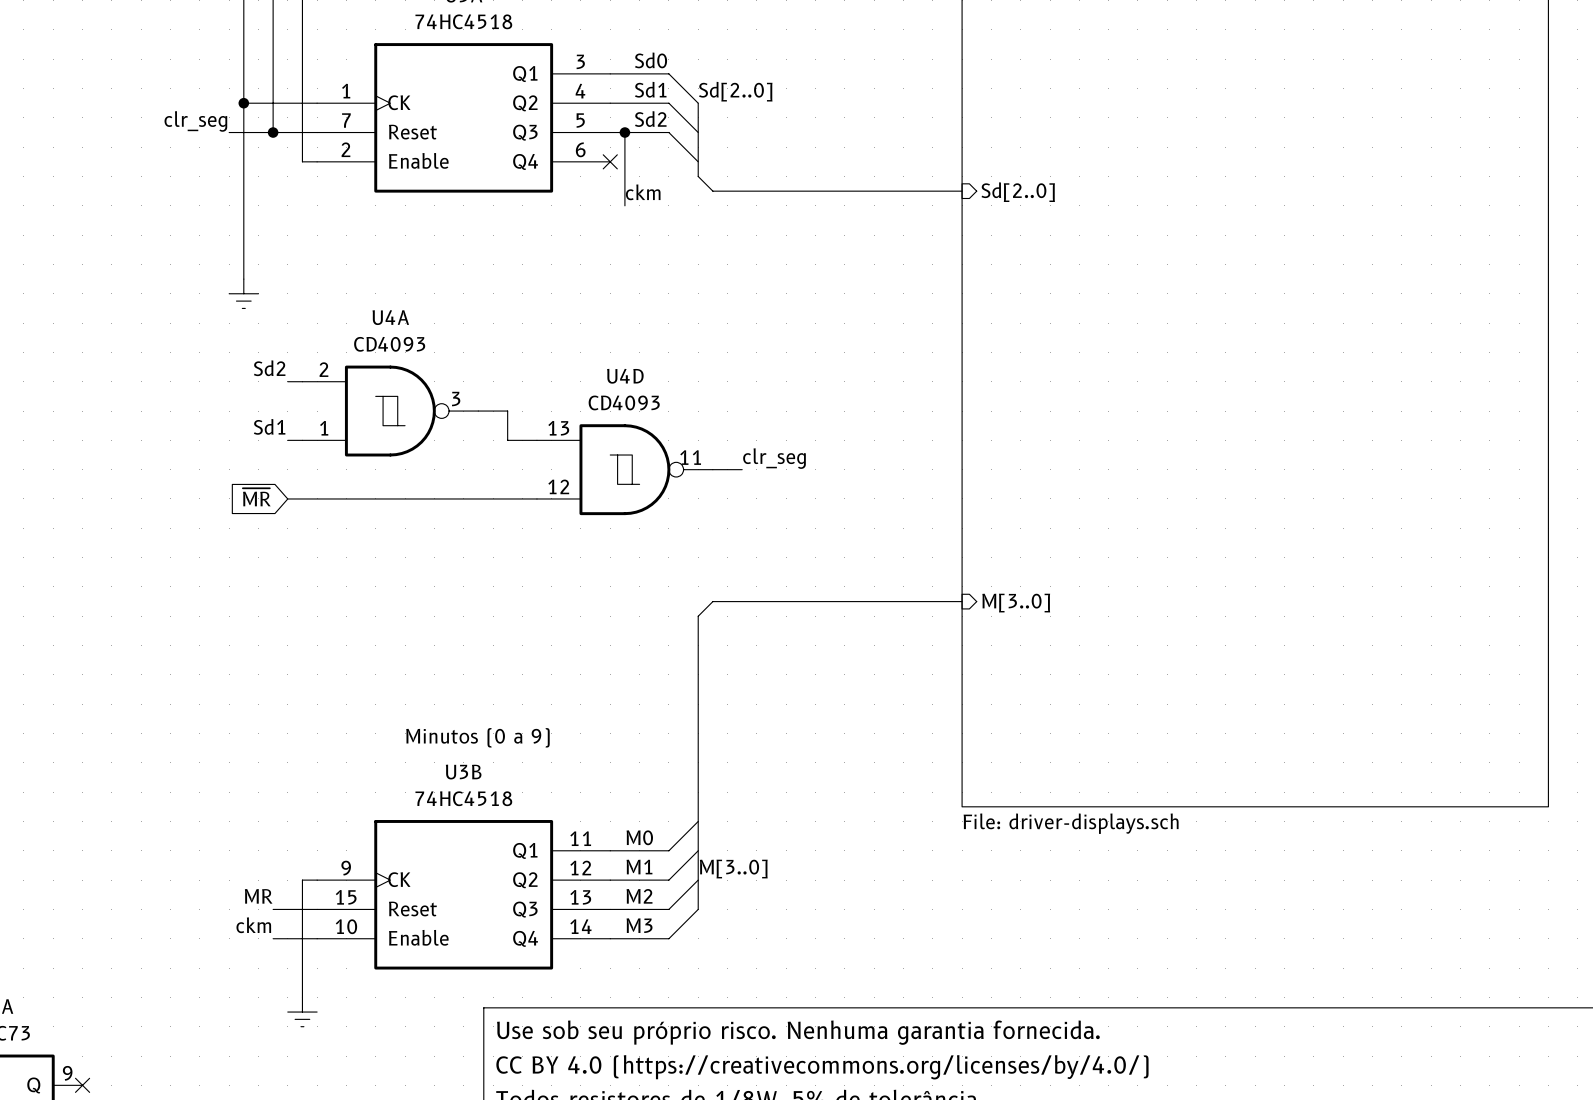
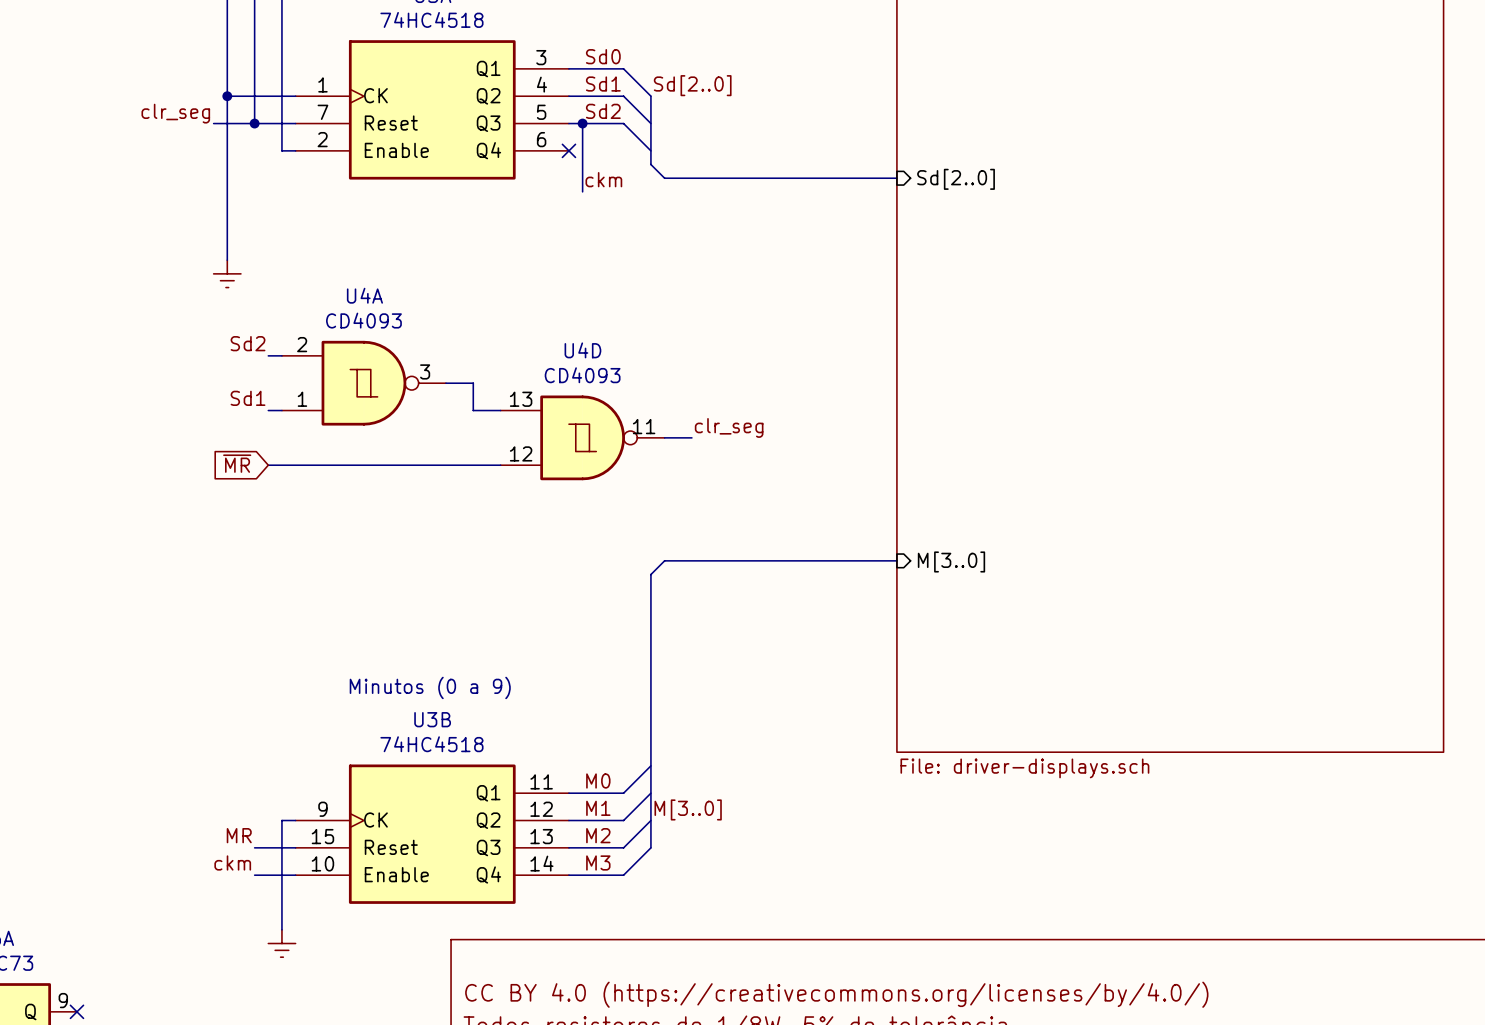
title block: Use sob seu próprio risco. Nenhuma garantia fornecida. (798, 1032) -> none

